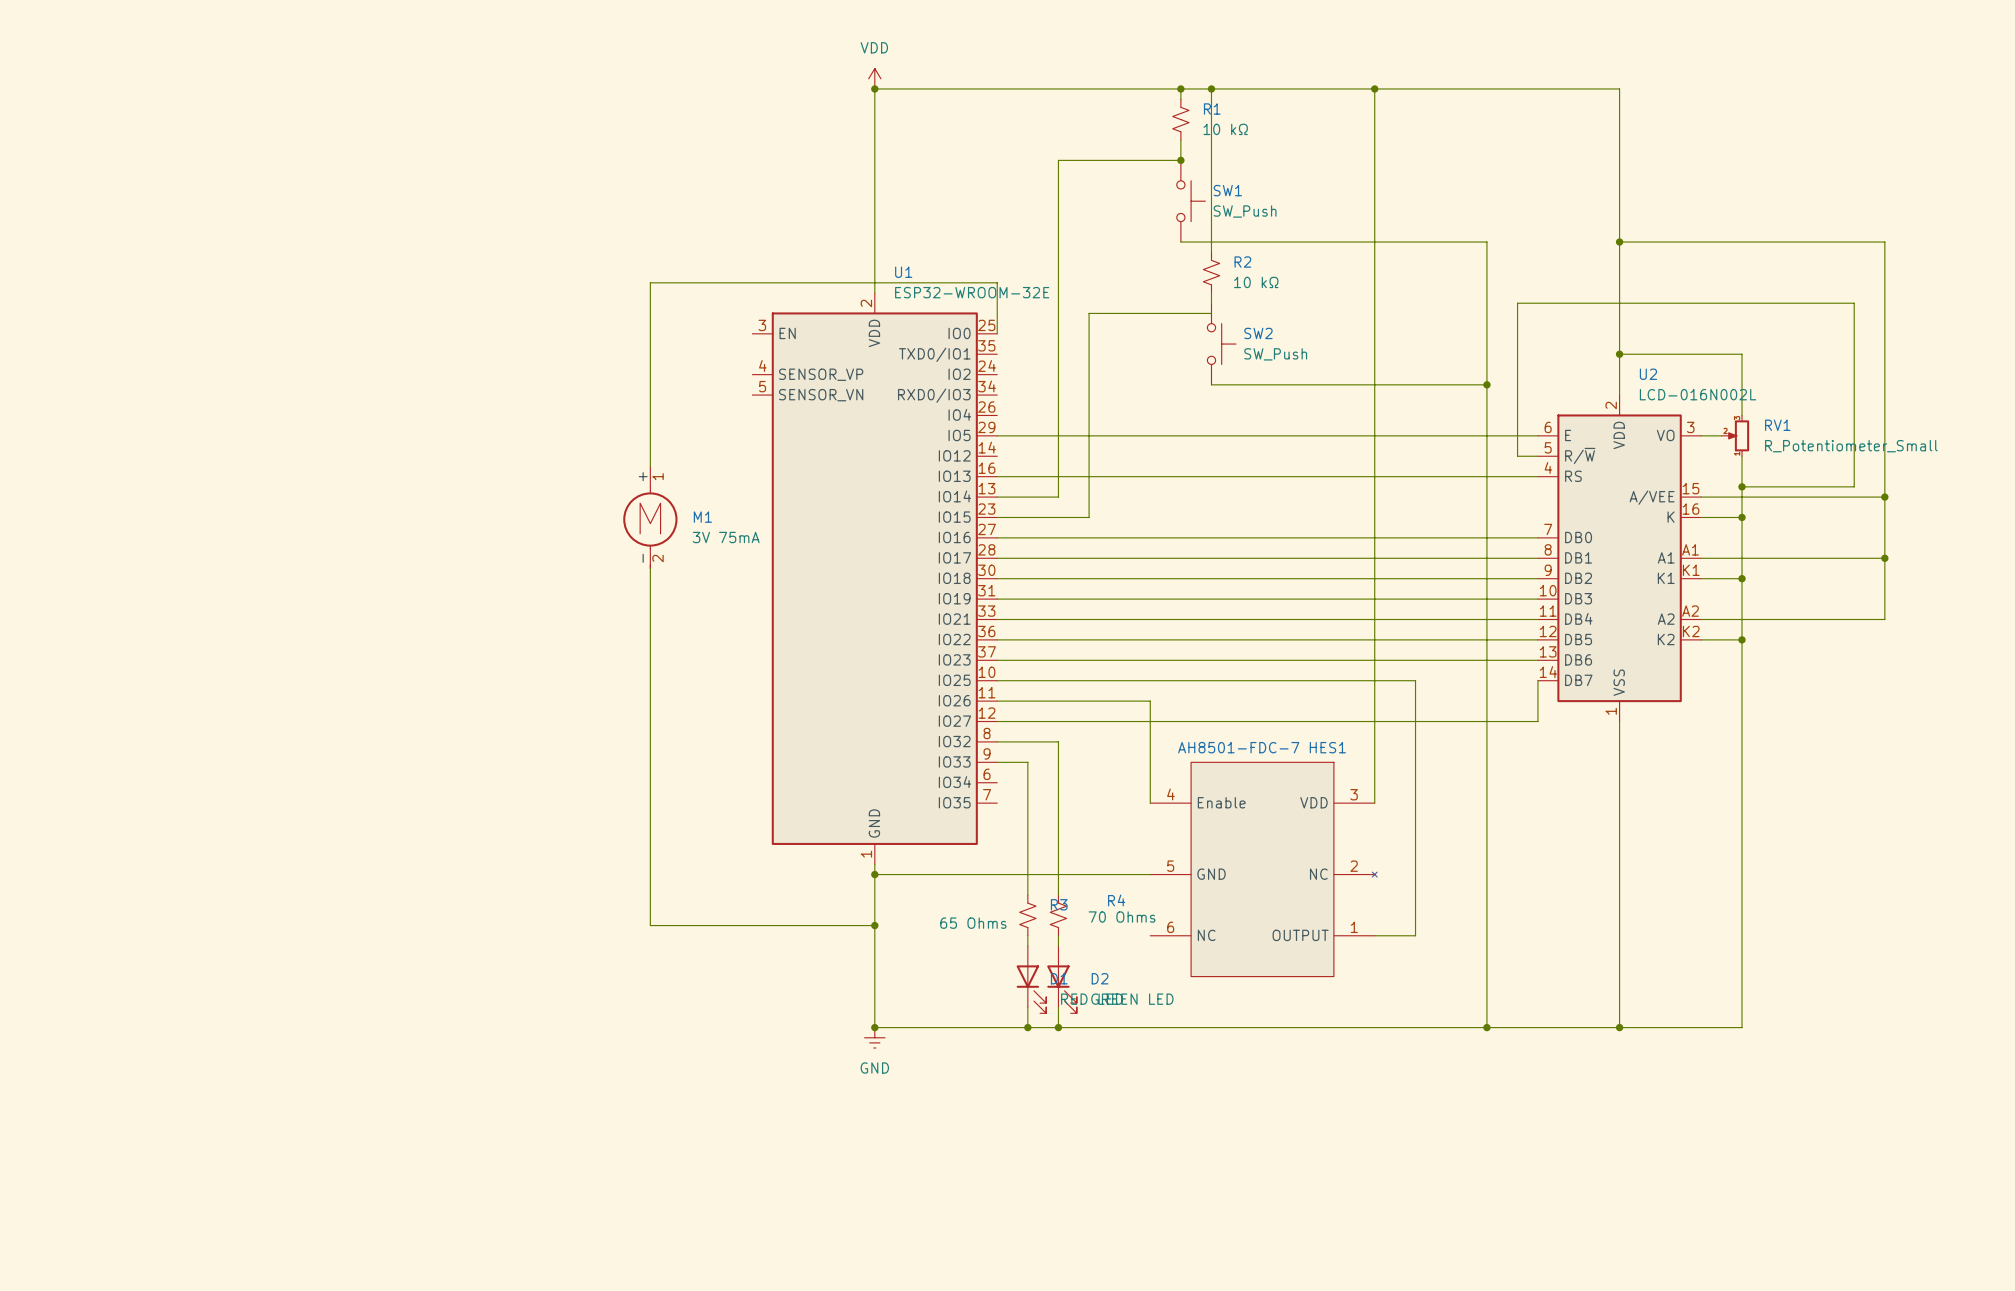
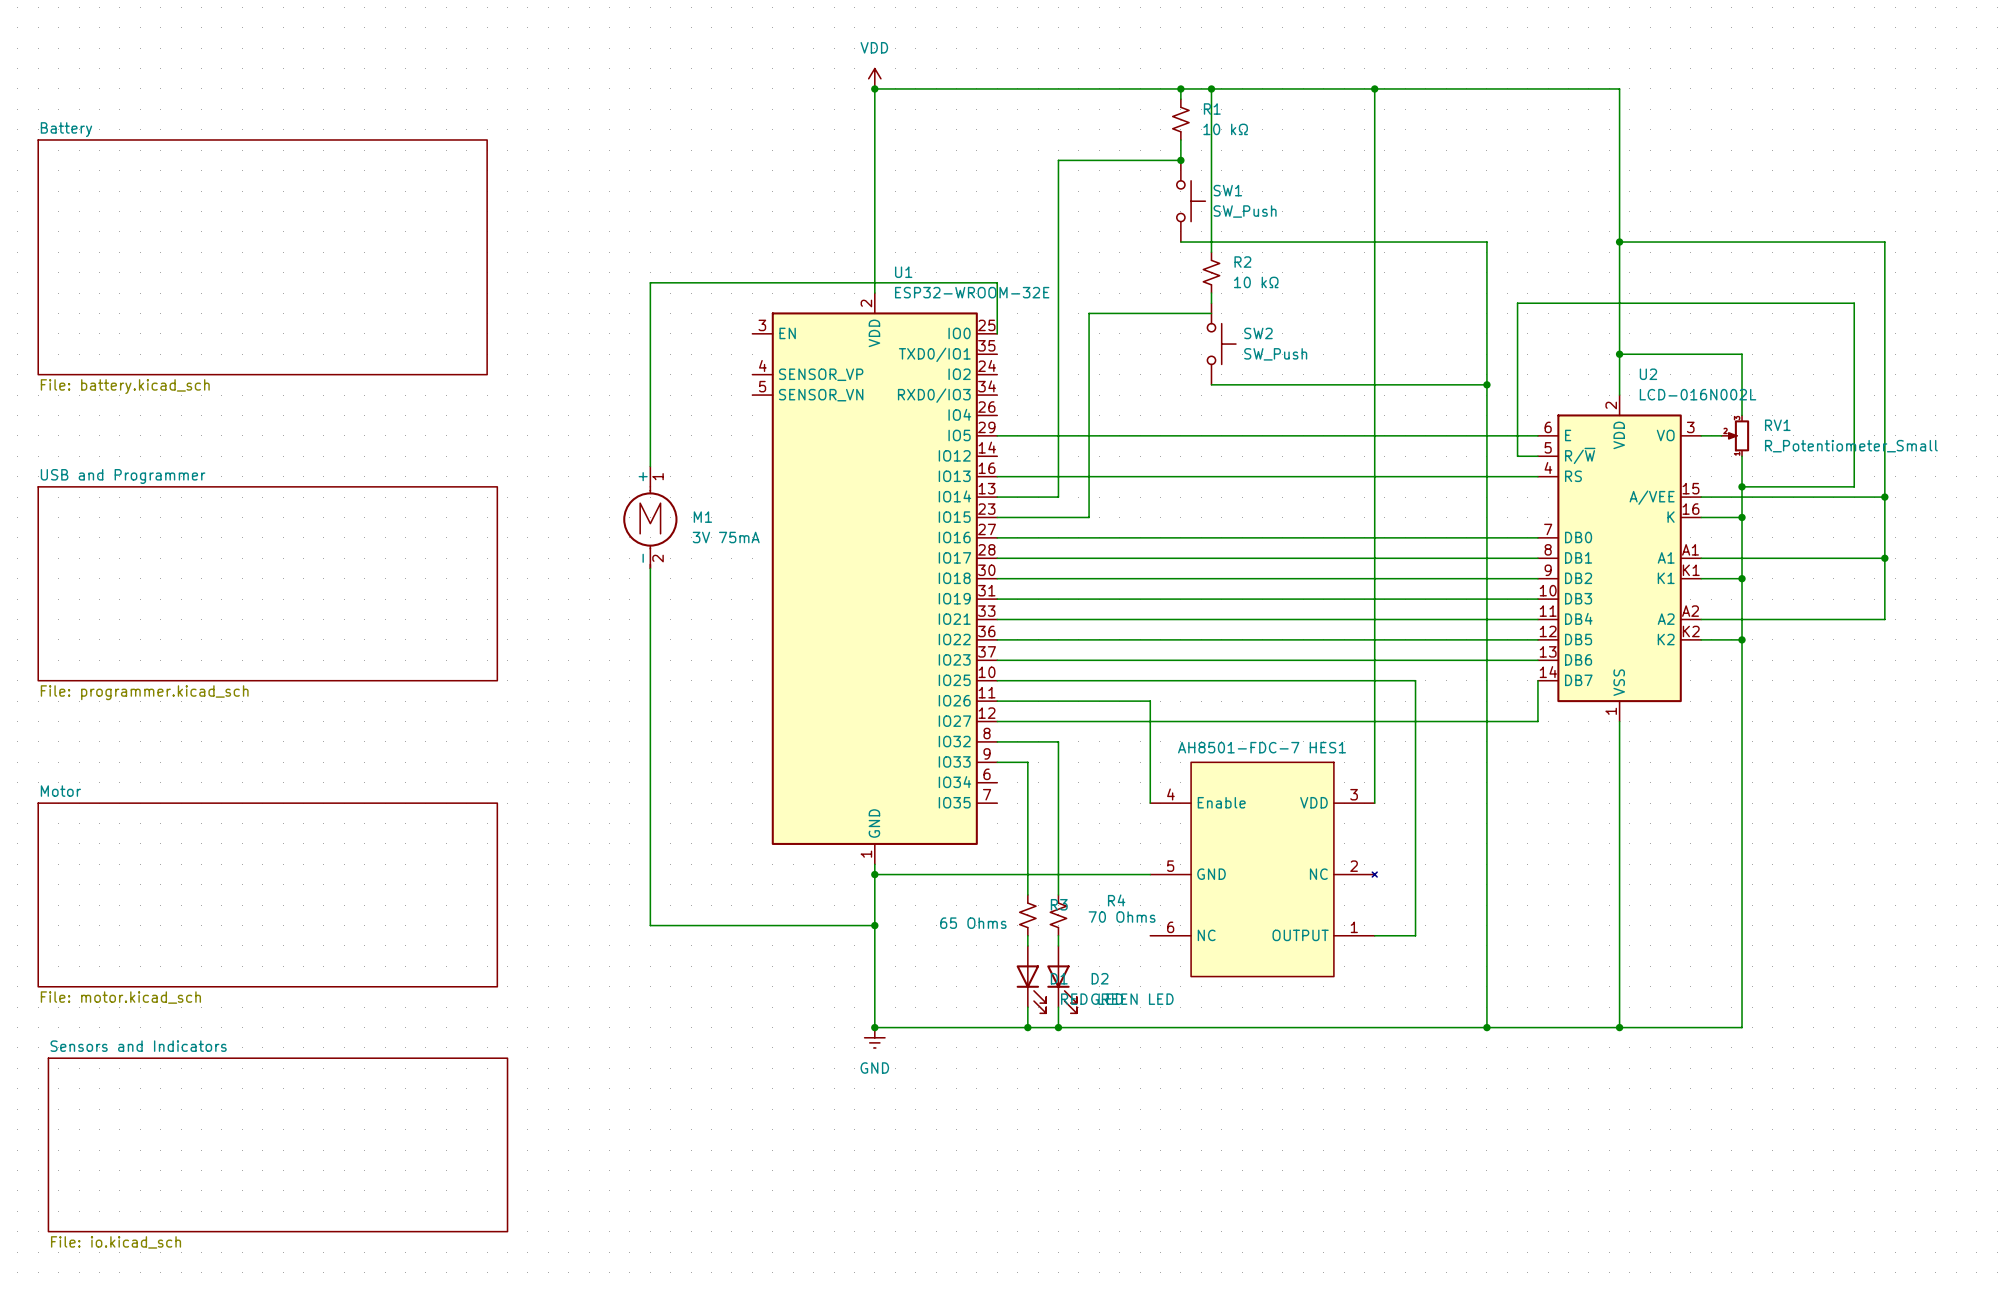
sheet Battery: none -> File: battery.kicad_sch (262, 257)
sheet USB and Programmer: none -> File: programmer.kicad_sch (267, 583)
sheet Motor: none -> File: motor.kicad_sch (267, 894)
sheet Sensors and Indicators: none -> File: io.kicad_sch (277, 1144)

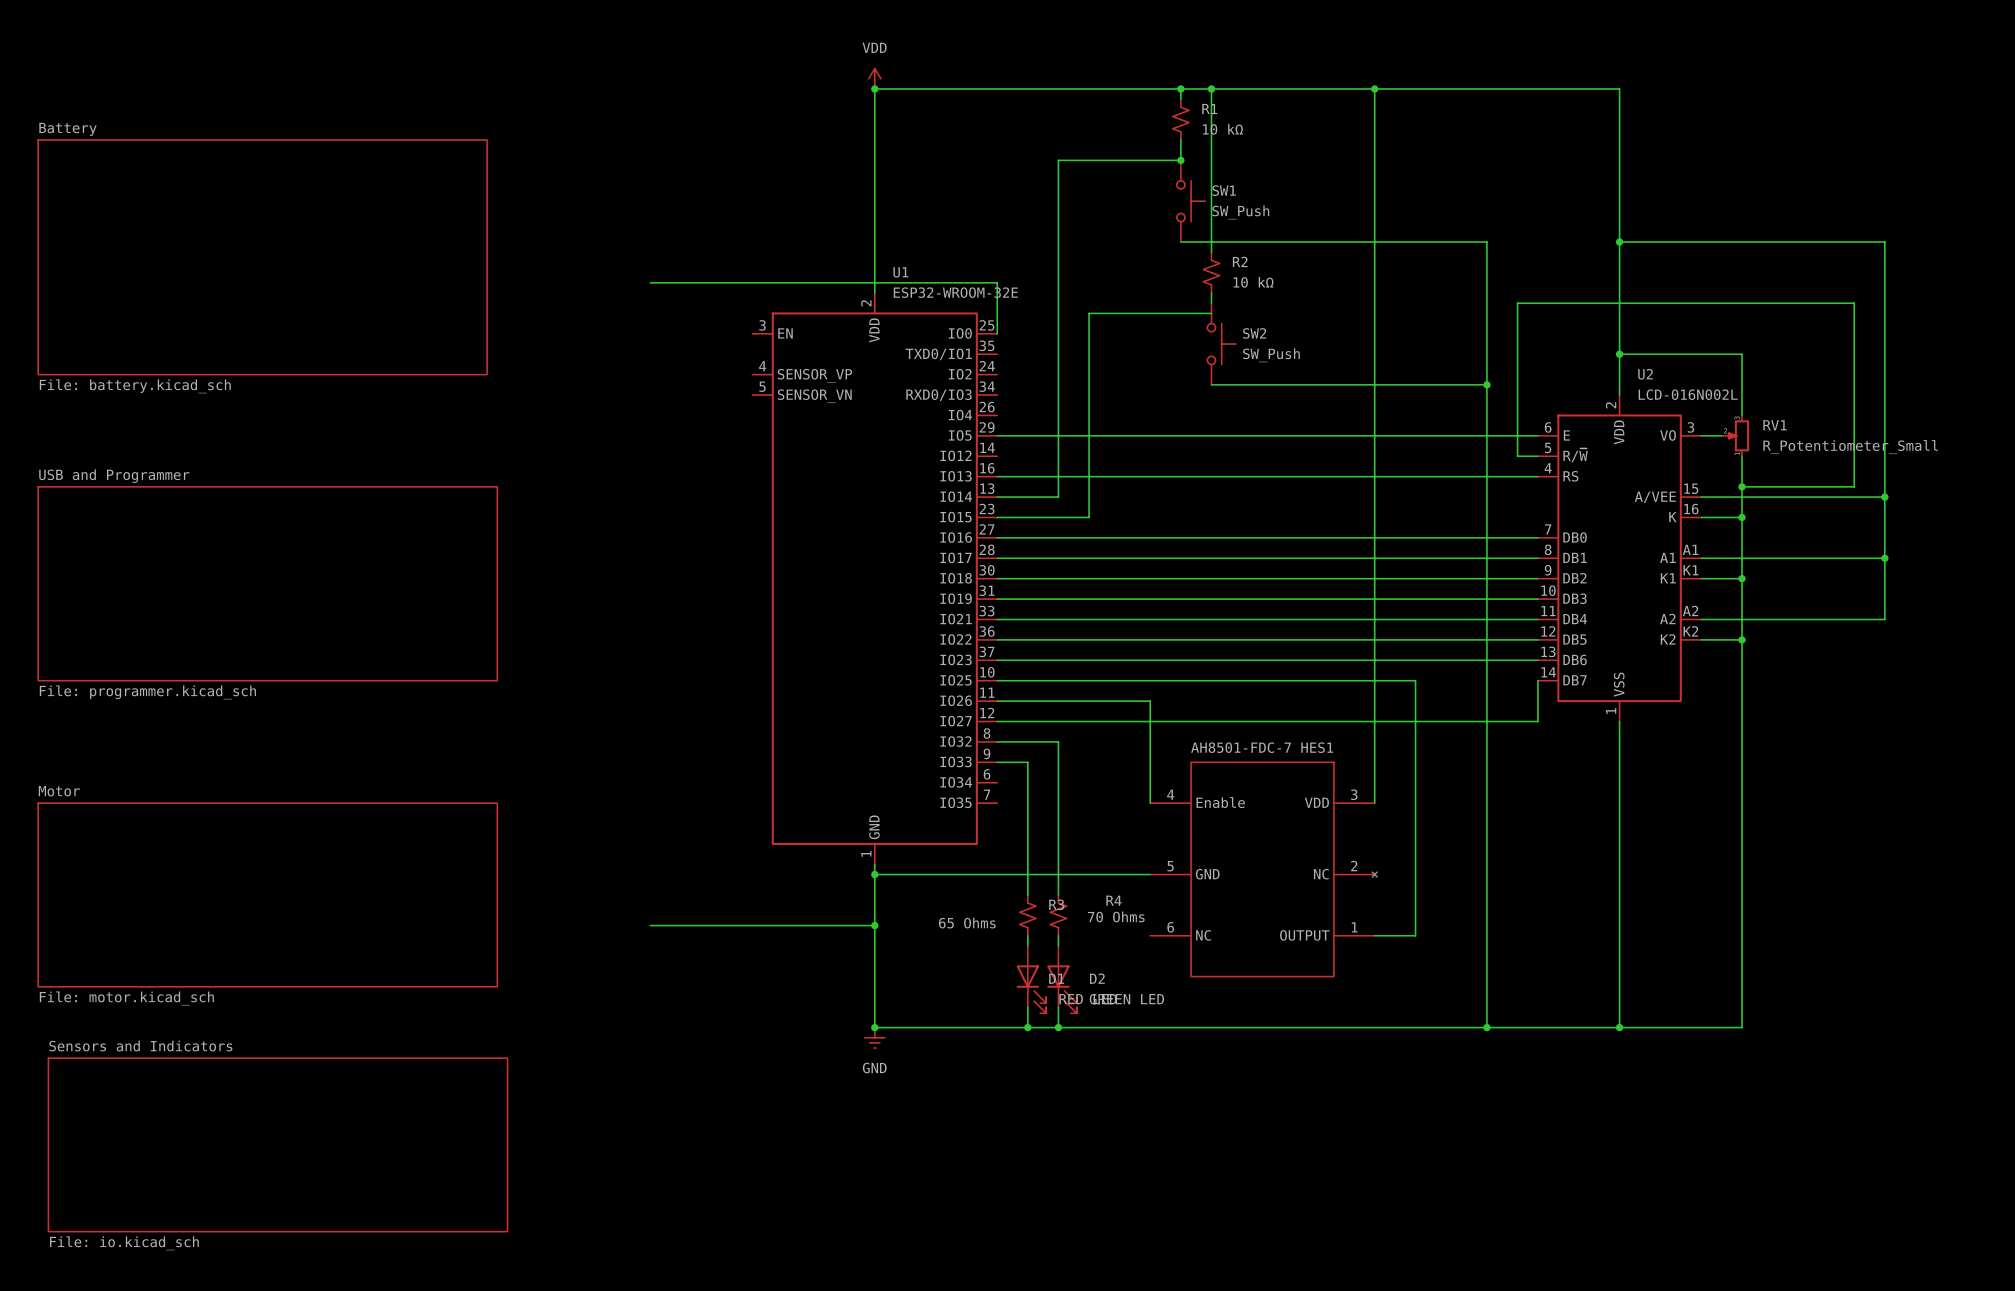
wire: (650, 282) (650, 466) -> none
M1: 3V 75mA (650, 517) -> none
wire: (650, 568) (650, 925) -> none

